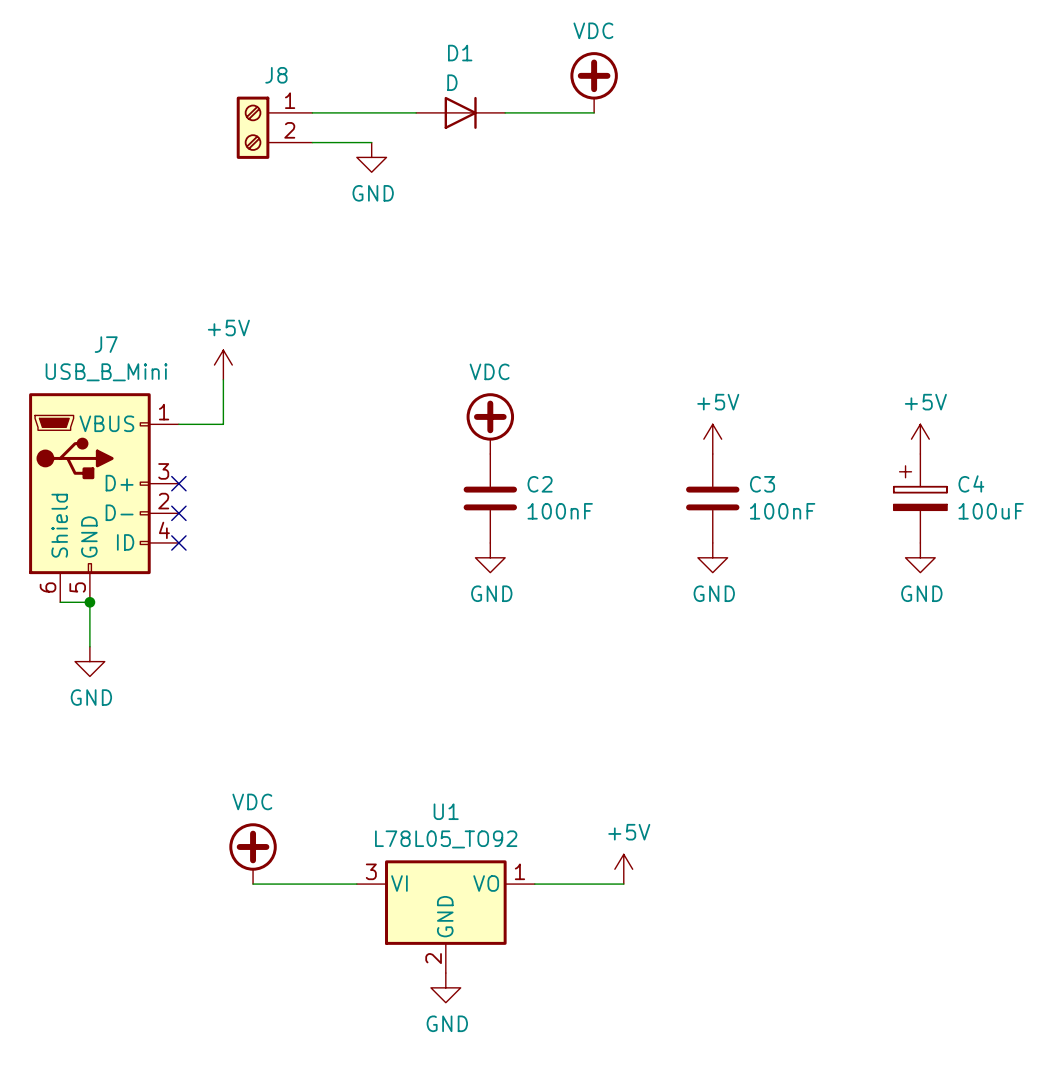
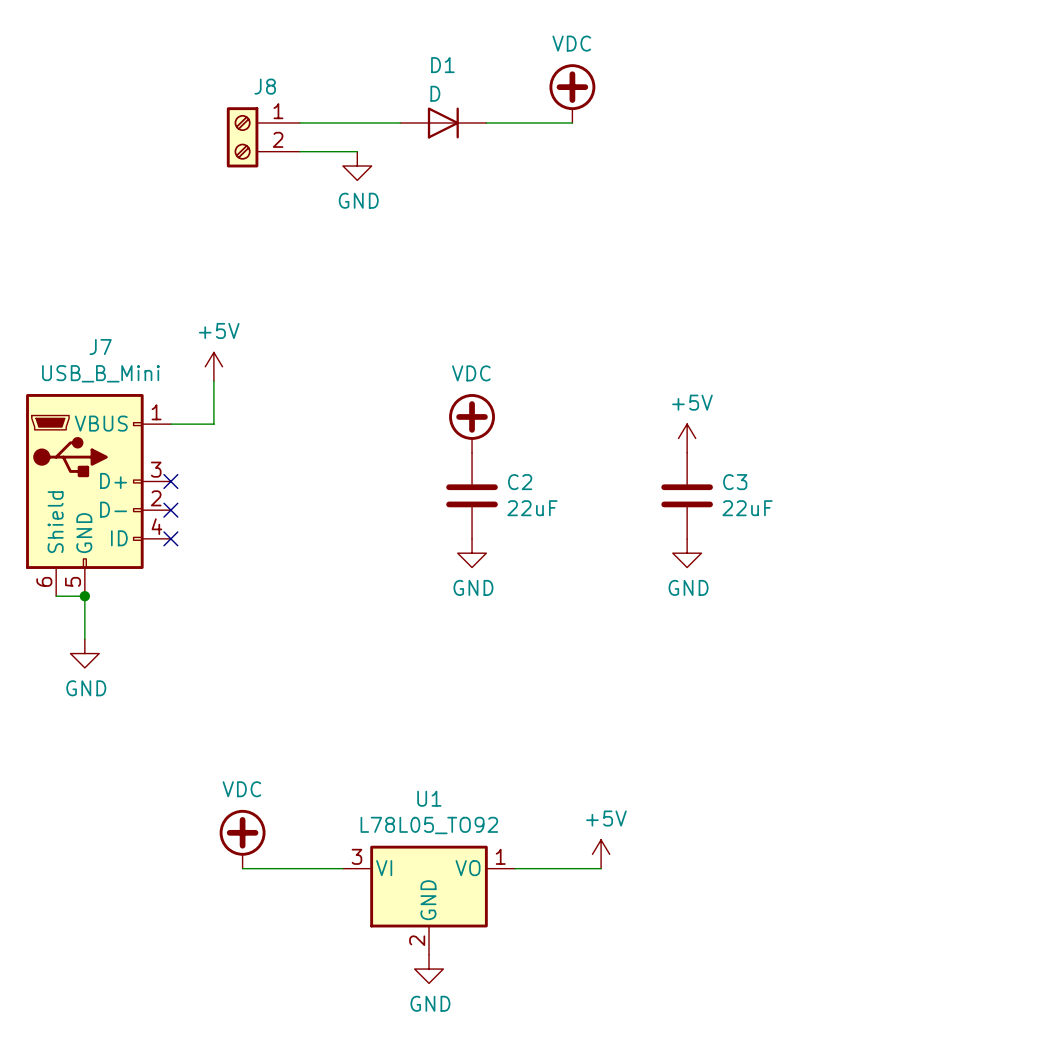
power symbol: +5V (920, 439) -> none
C4: 100uF (920, 498) -> none
C2 value: 100nF (560, 511) -> 22uF (532, 508)
C3 value: 100nF (782, 511) -> 22uF (747, 508)
power symbol: GND (920, 557) -> none

